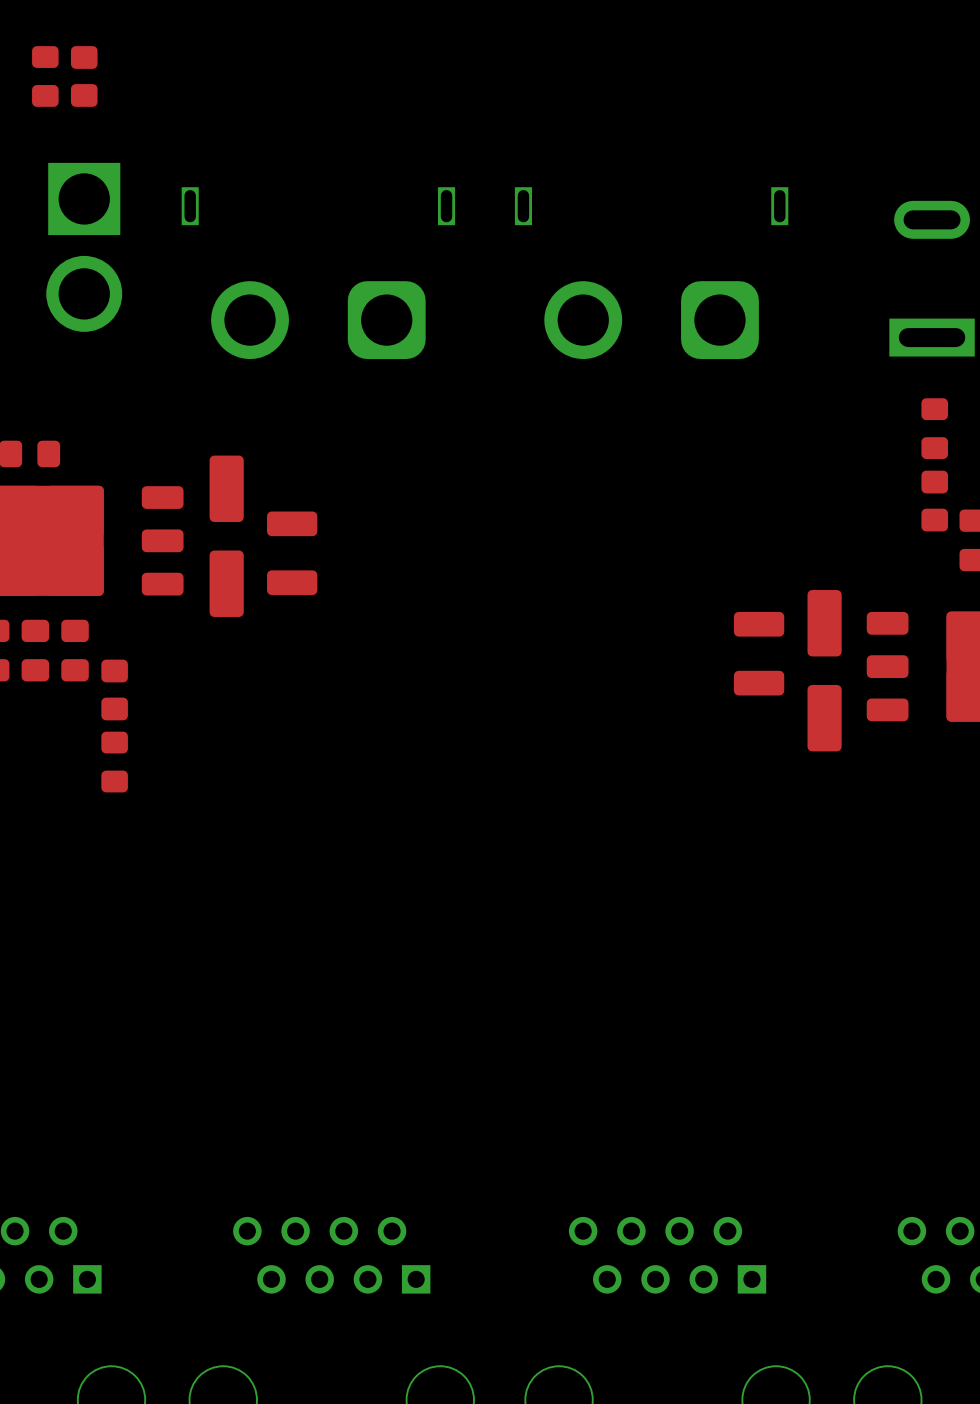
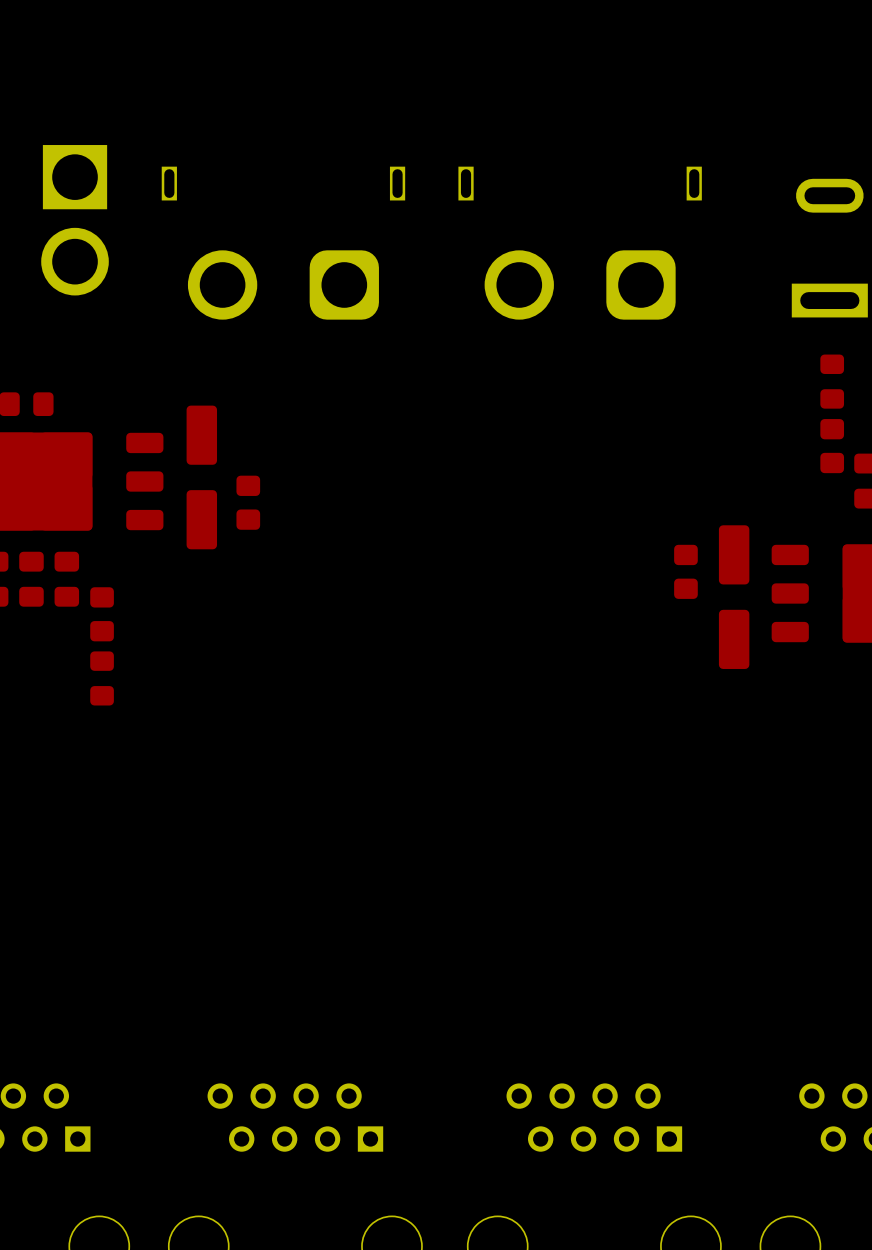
part: (45, 76) -> none
part: (84, 76) -> none
part footprint: [267, 511, 318, 596] -> [236, 475, 261, 530]
part footprint: [733, 611, 785, 696] -> [674, 544, 698, 599]

